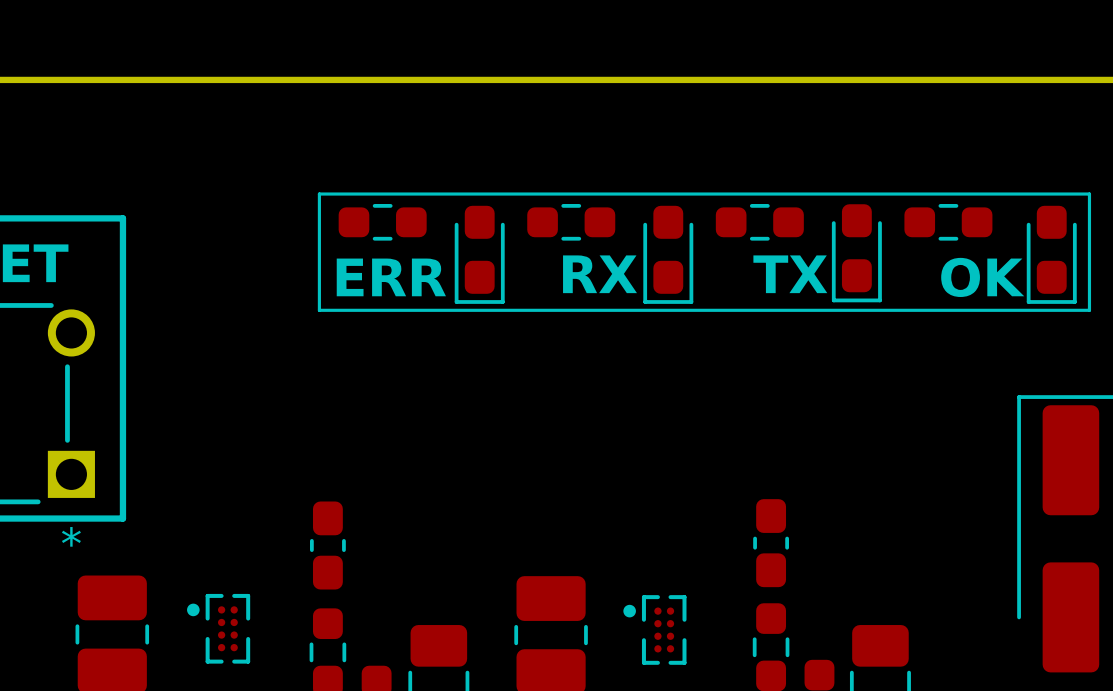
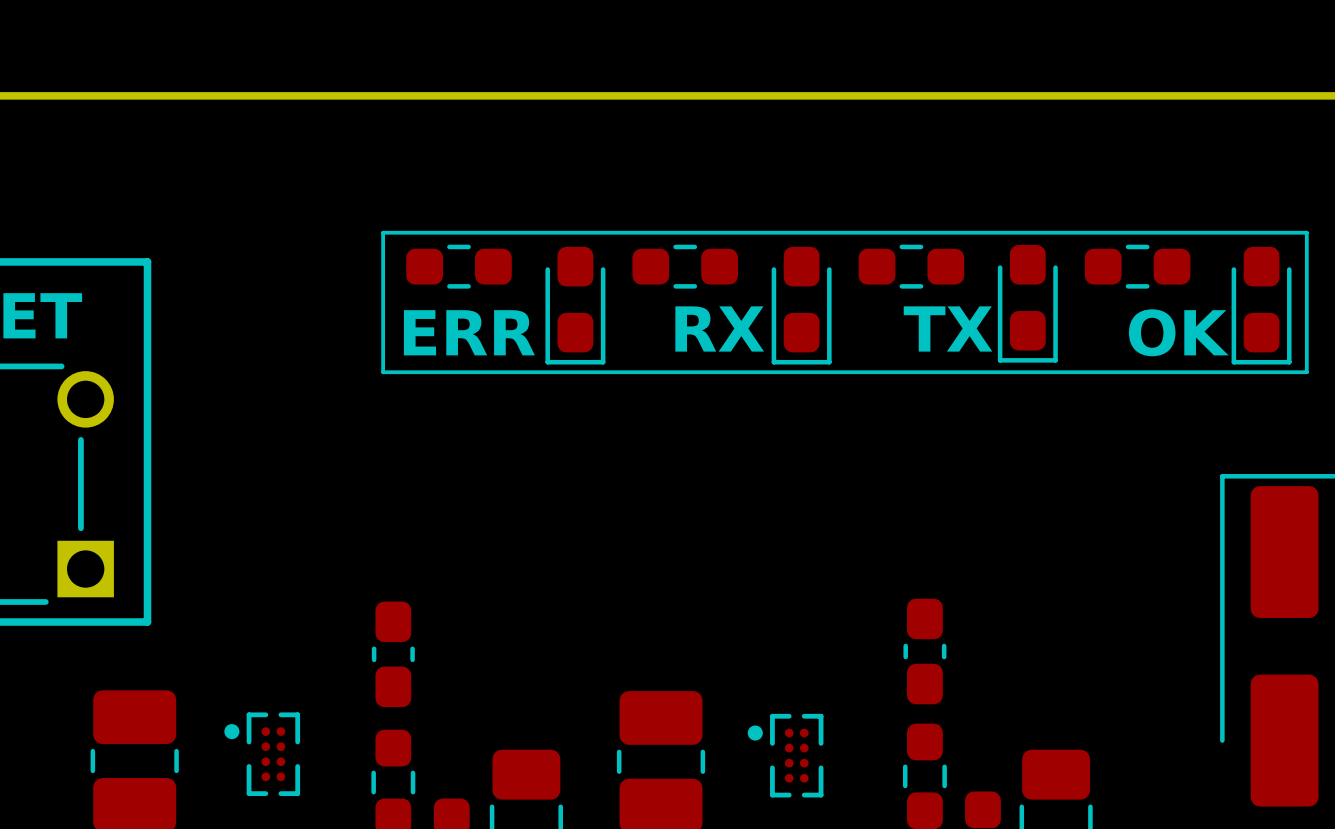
part text: * (71, 536) -> none

